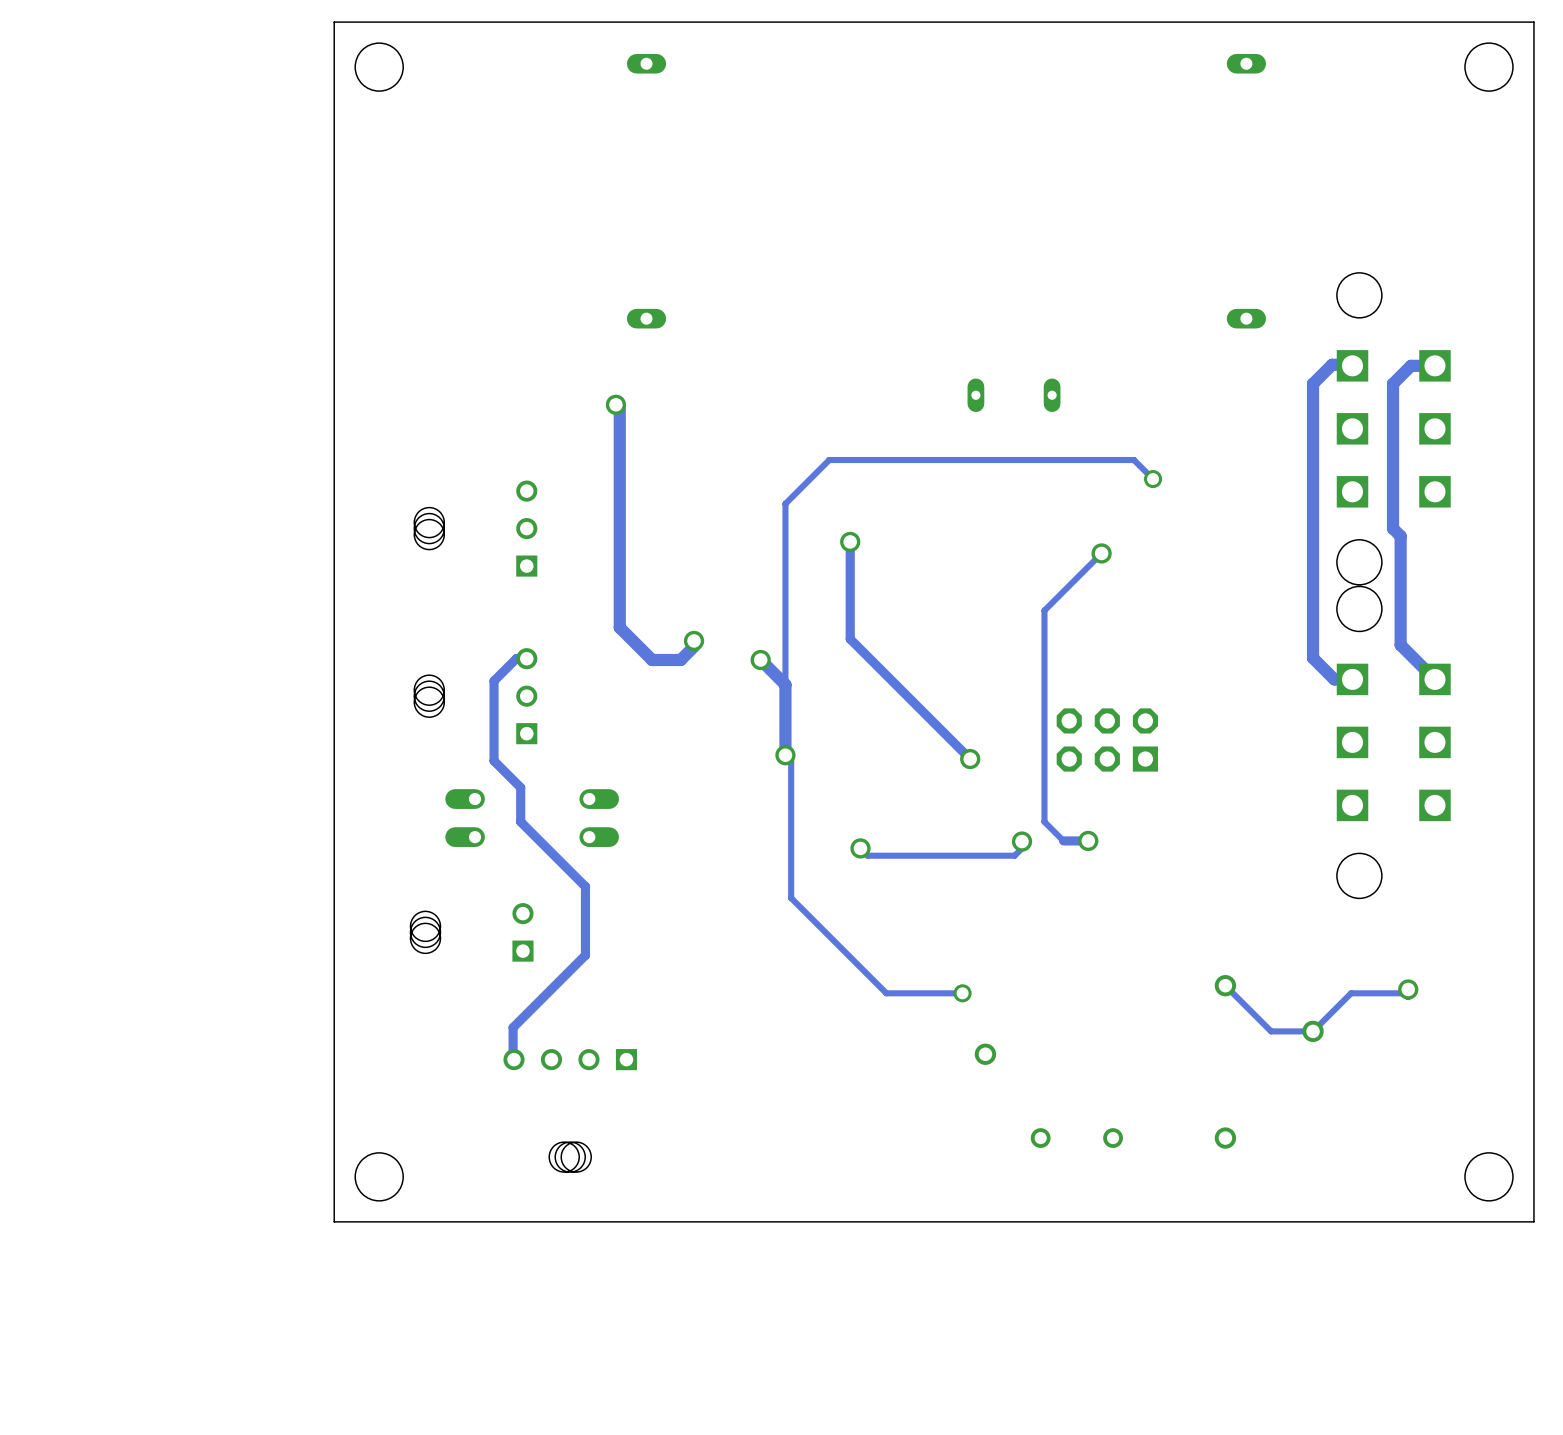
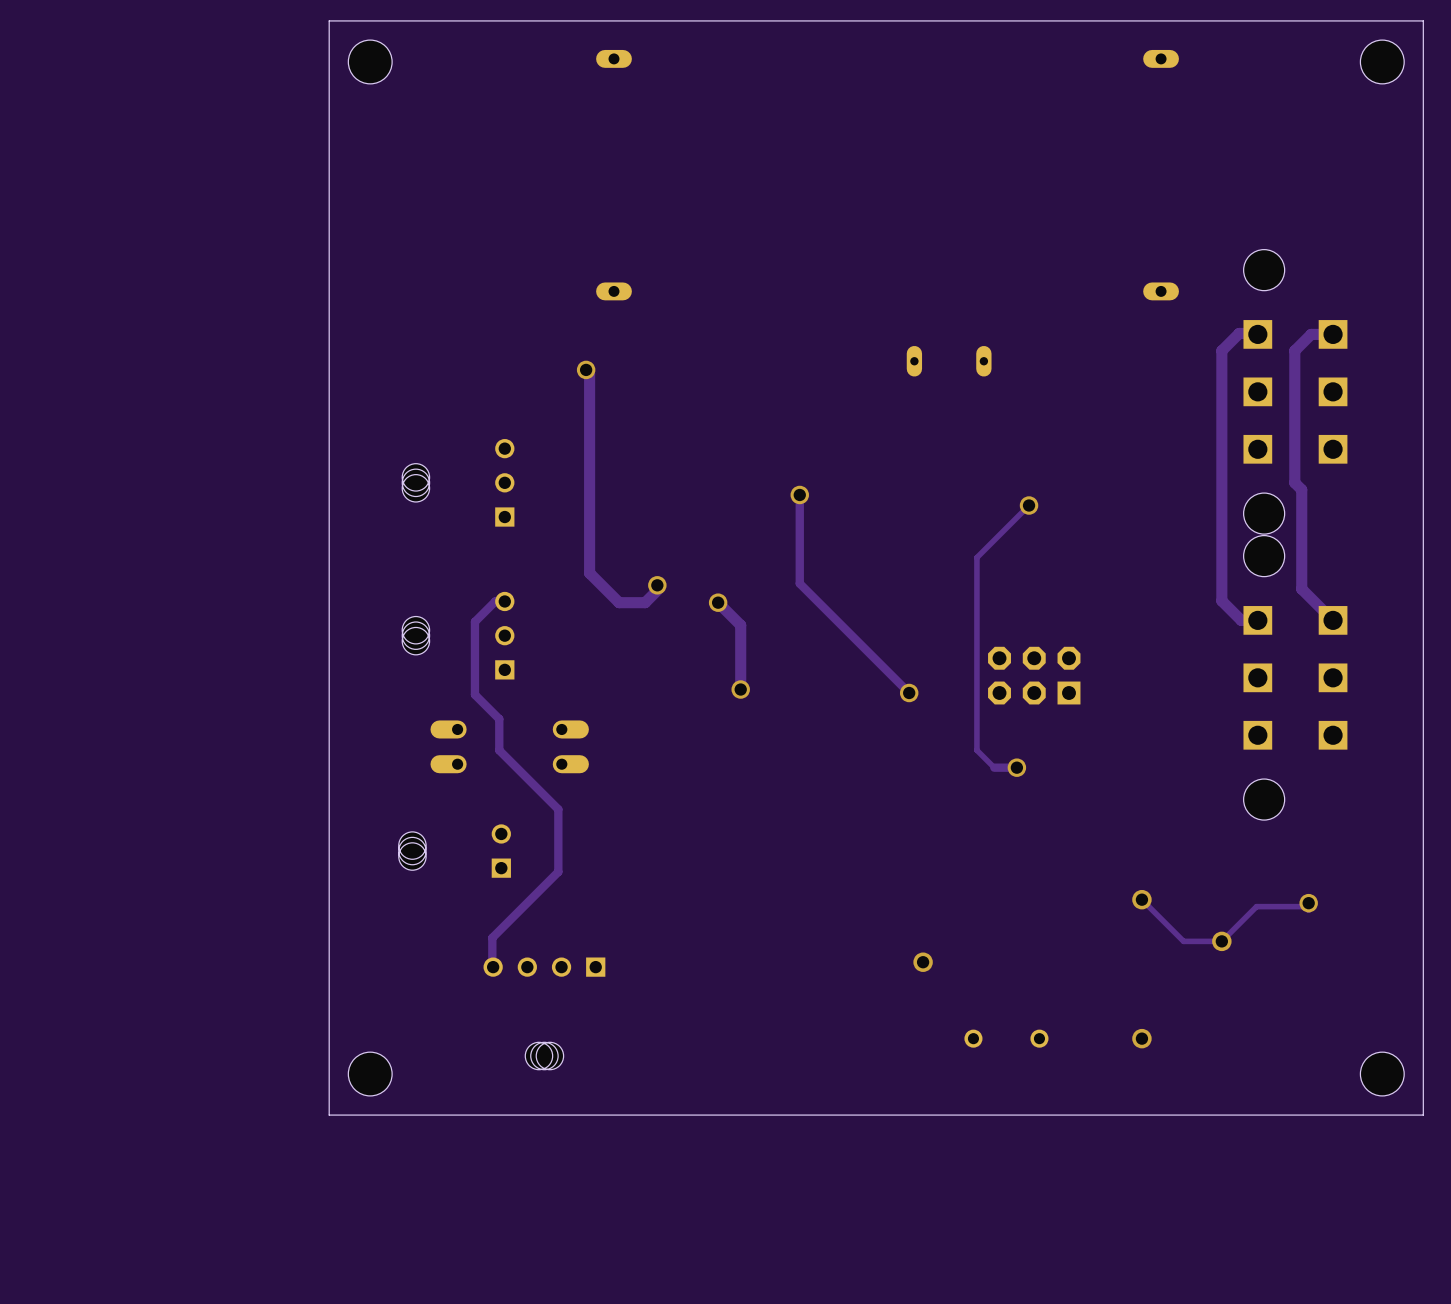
track: (1153, 479) (1133, 460) (829, 460) (785, 503) (785, 684) -> none
via: (1153, 479) -> none
track: (785, 755) (791, 760) (791, 898) (886, 993) (962, 993) -> none
track: (1022, 841) (1022, 848) (1014, 855) (867, 855) (860, 848) -> none
via: (1022, 841) -> none
via: (860, 848) -> none
via: (962, 993) -> none

